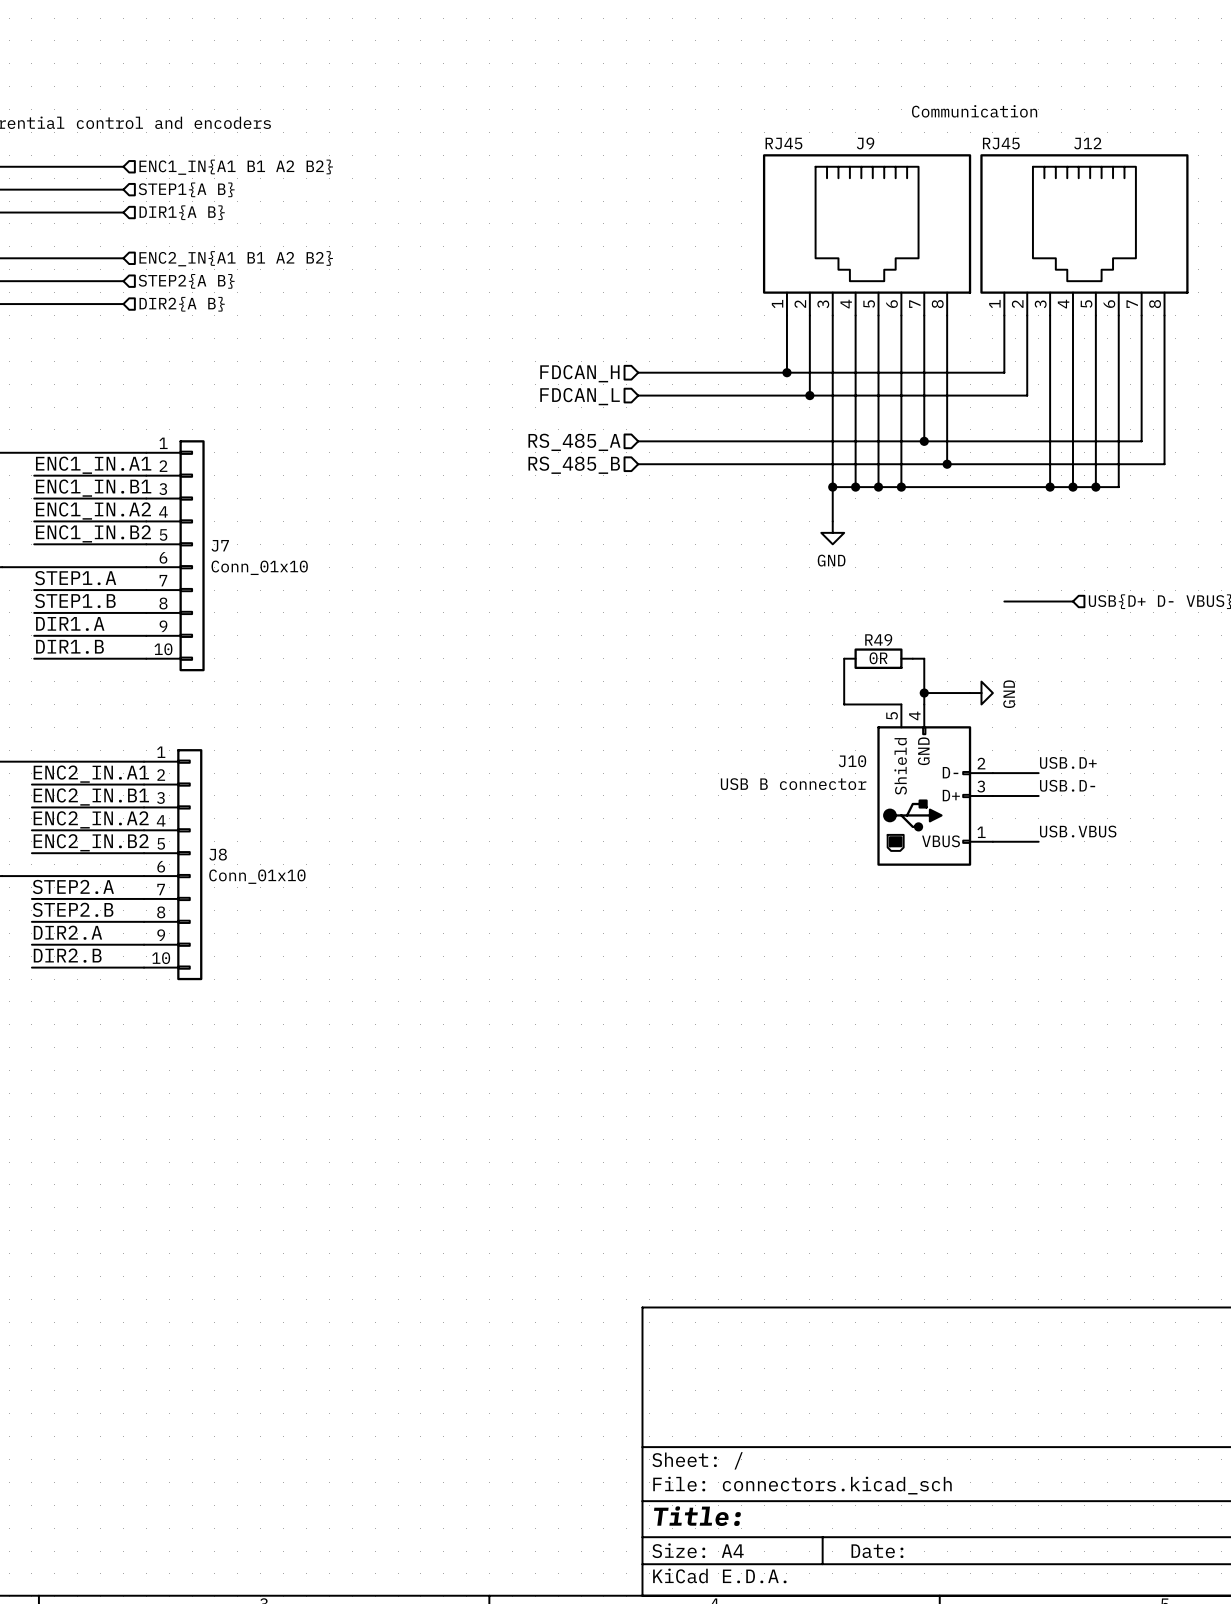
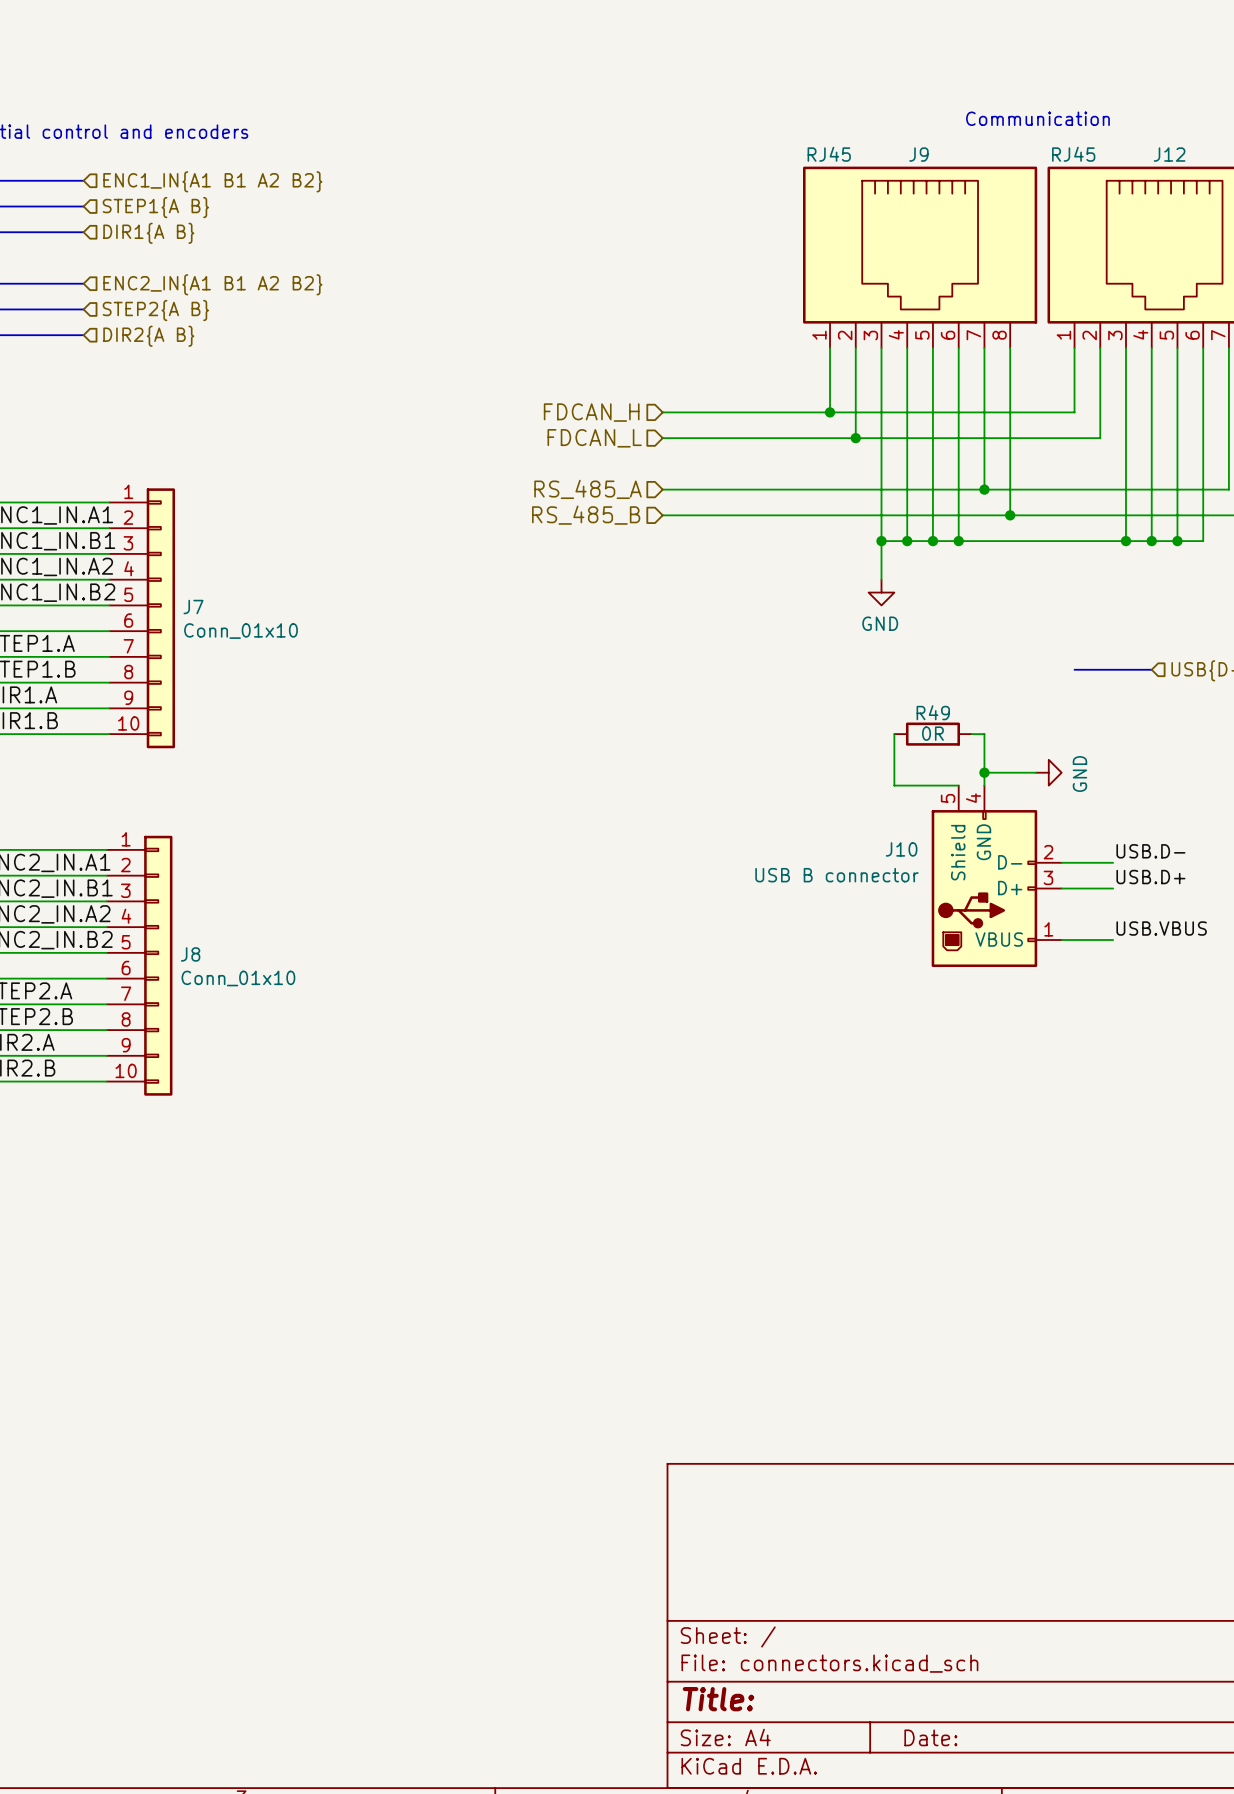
label: USB.D+ (1068, 762) -> USB.D- (1150, 851)
label: USB.D- (1067, 785) -> USB.D+ (1150, 877)

